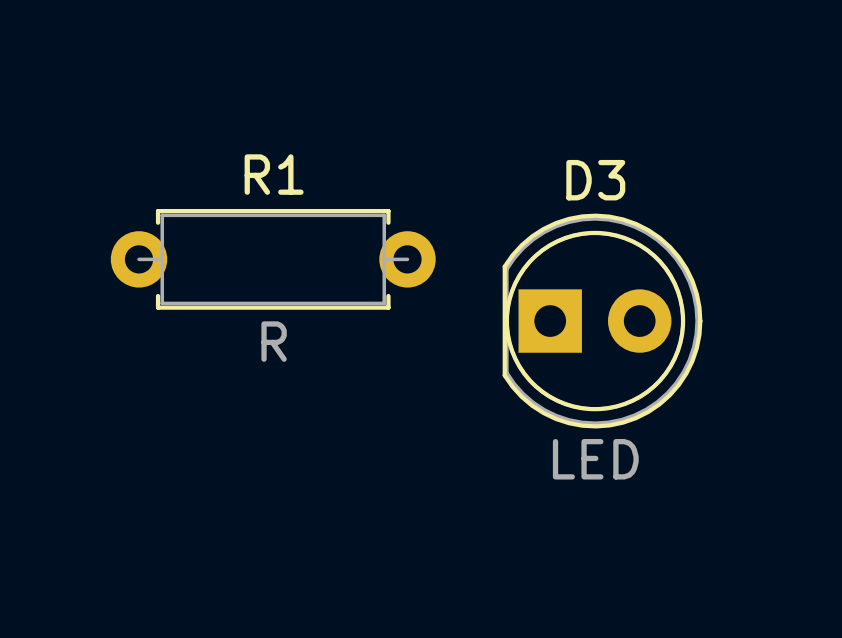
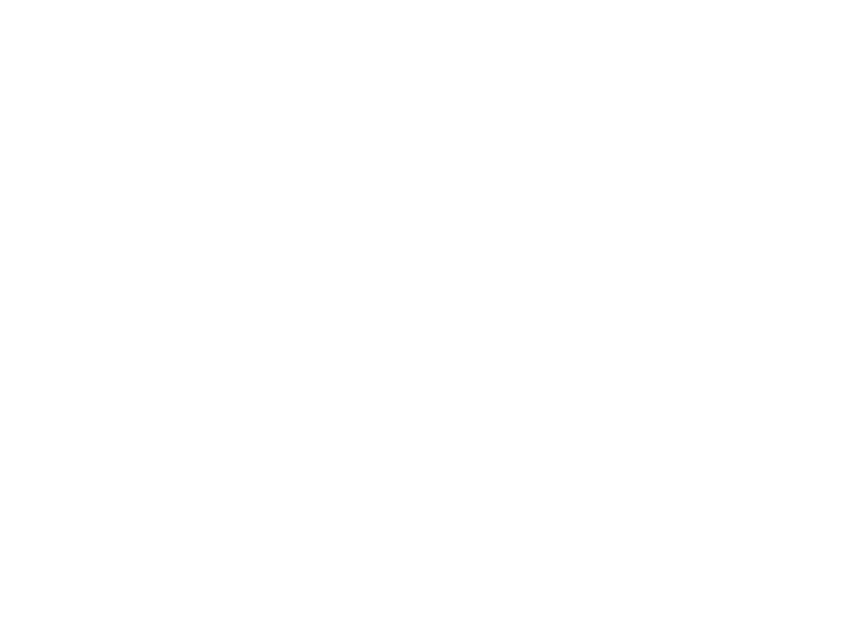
R1: R (273, 259) -> none
D3: LED (602, 321) -> none

